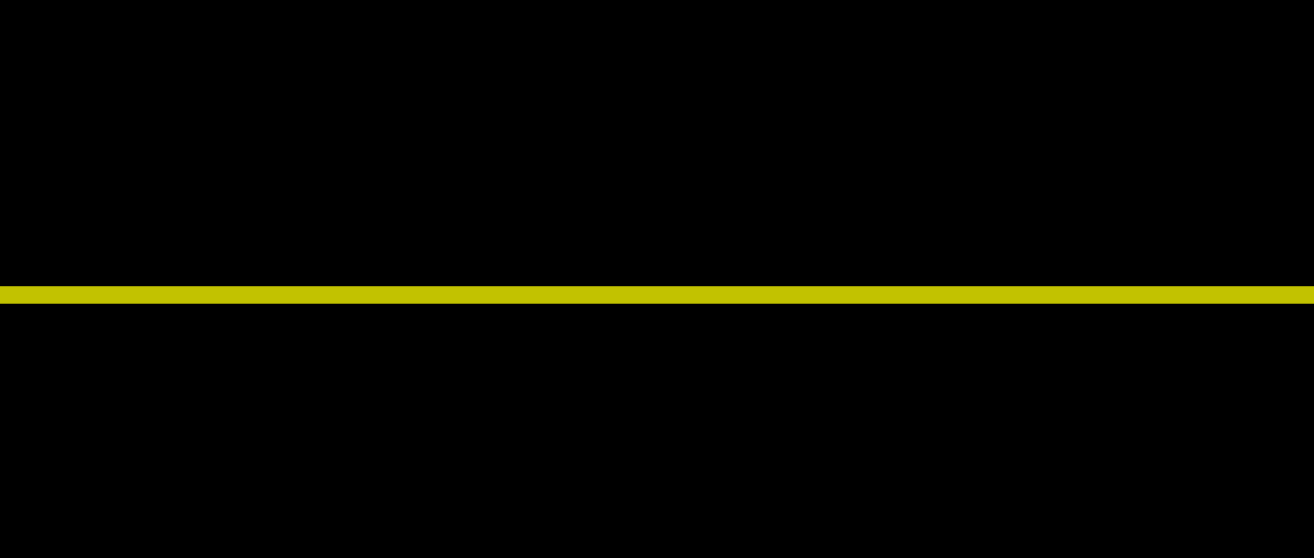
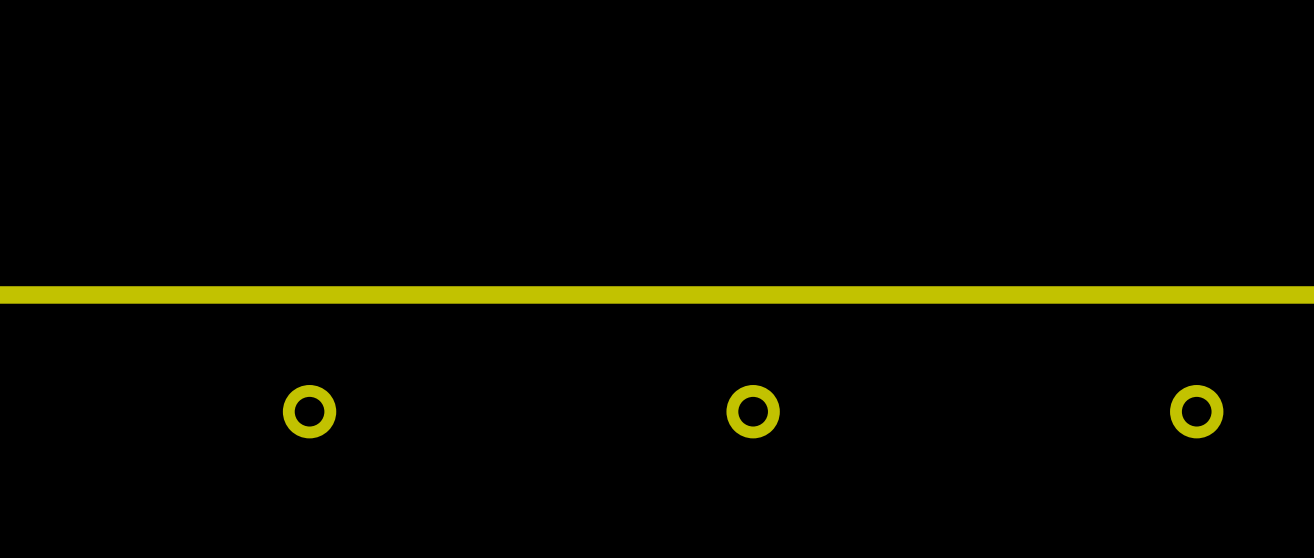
part: none -> (309, 411)
part: none -> (753, 411)
part: none -> (1196, 411)

